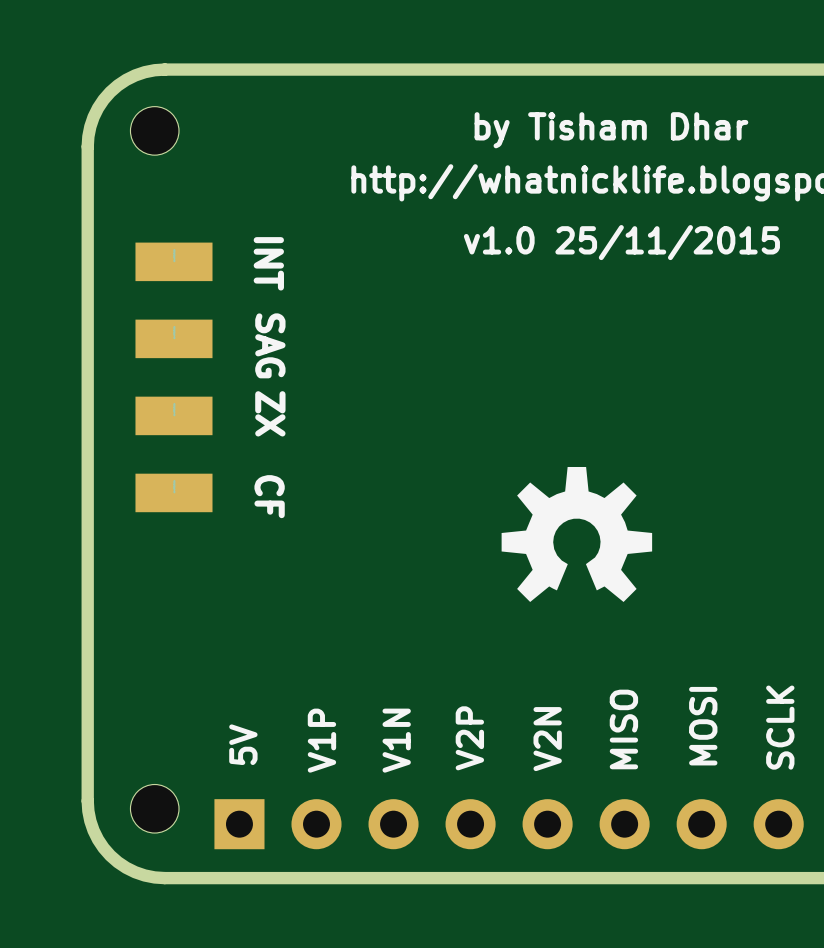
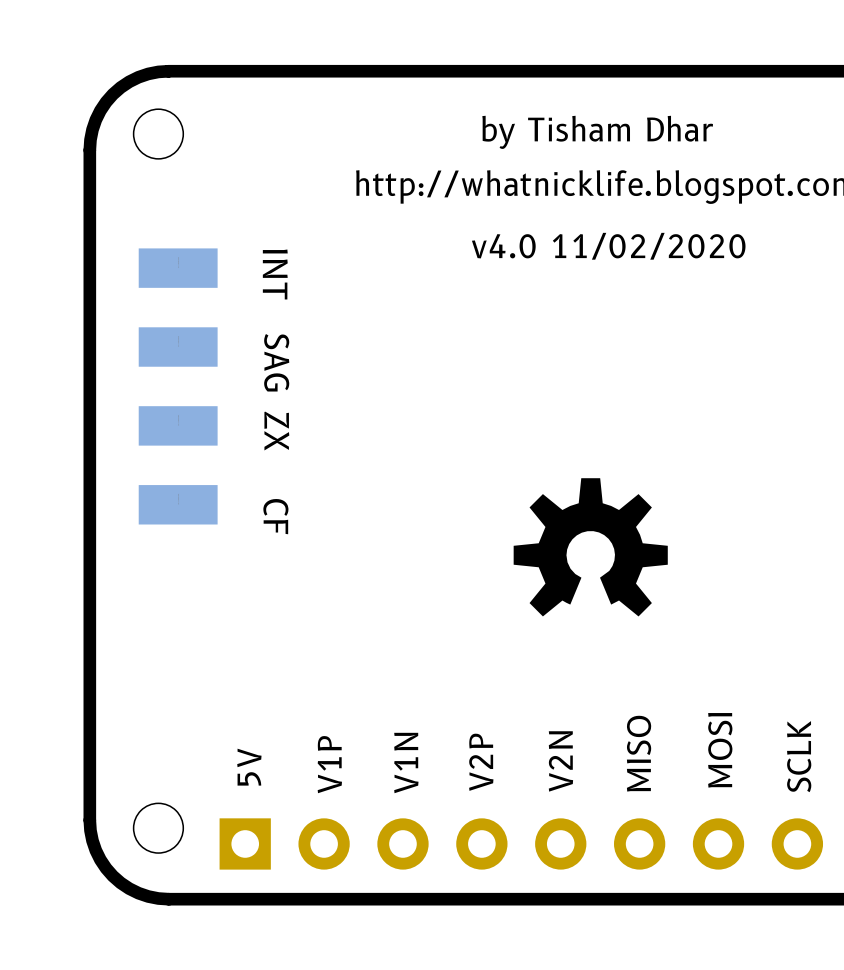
text: v1.0 25/11/2015 (621, 242) -> v4.0 11/02/2020 (608, 246)

